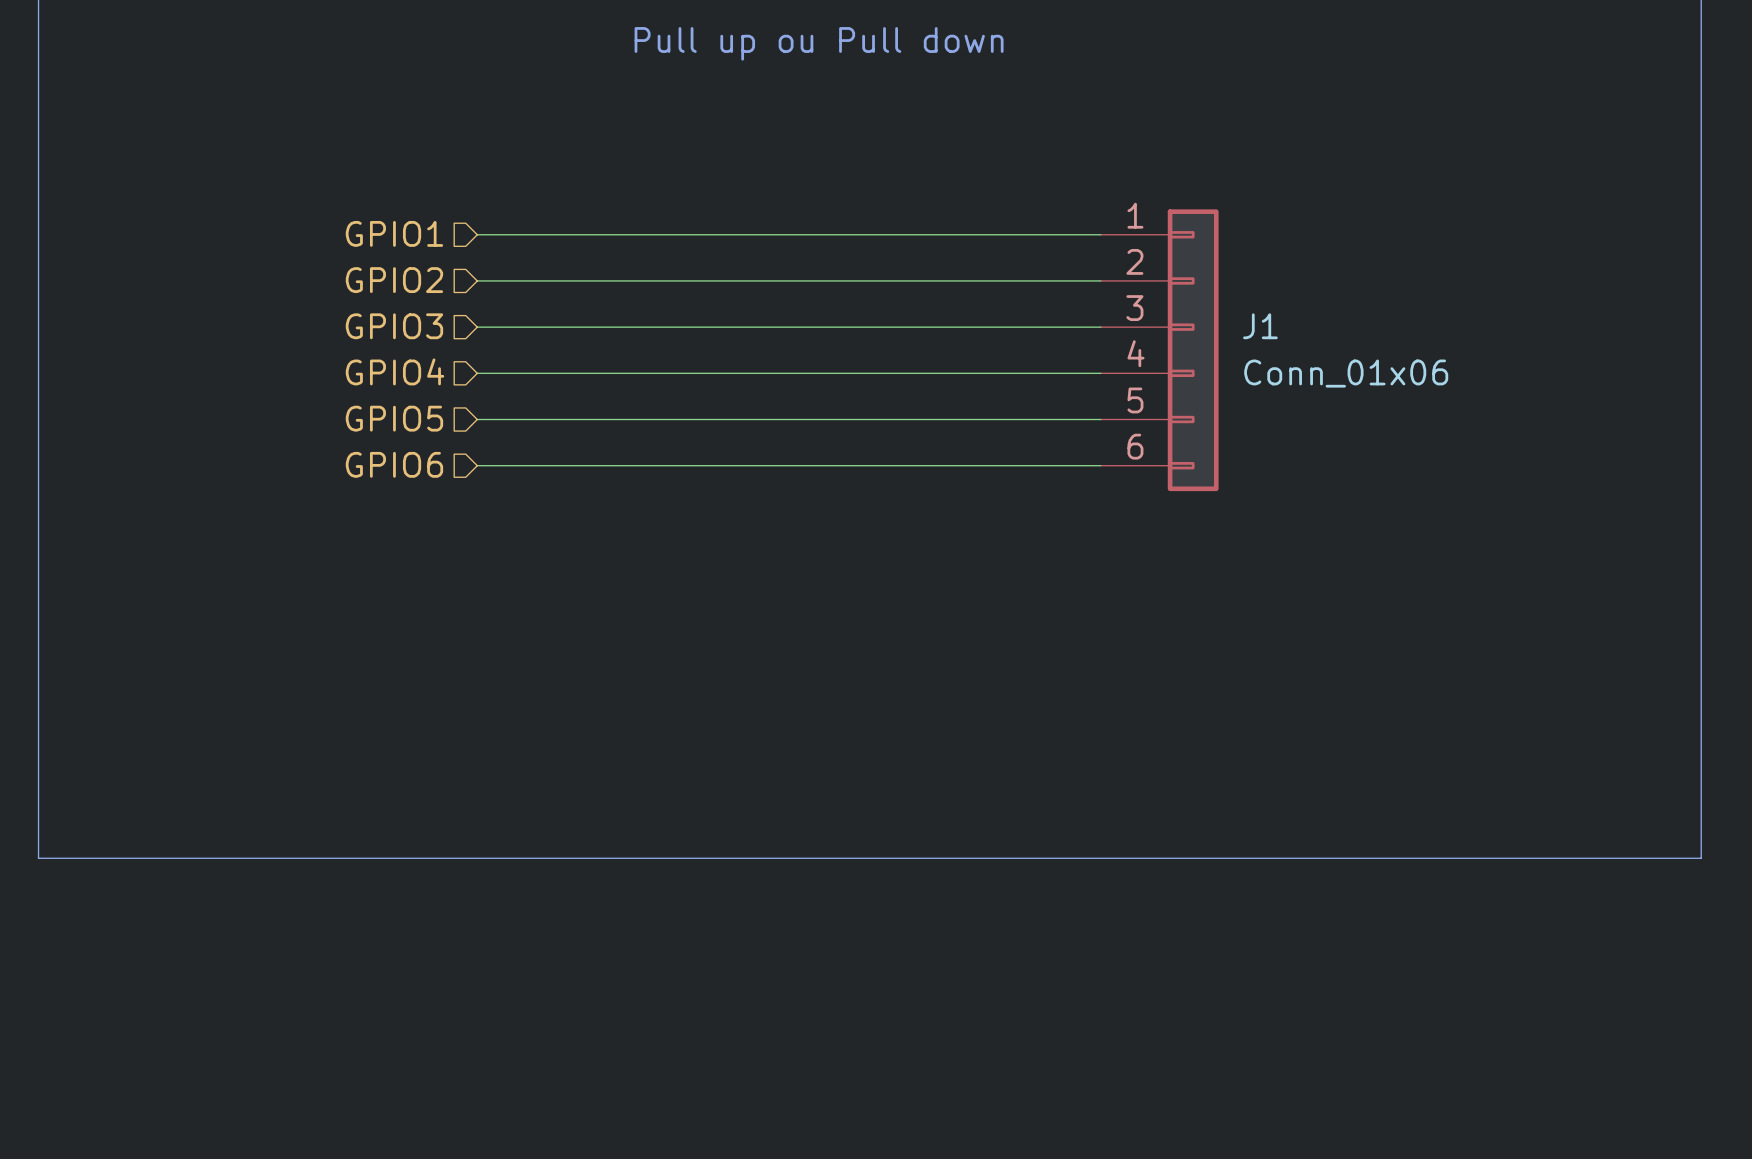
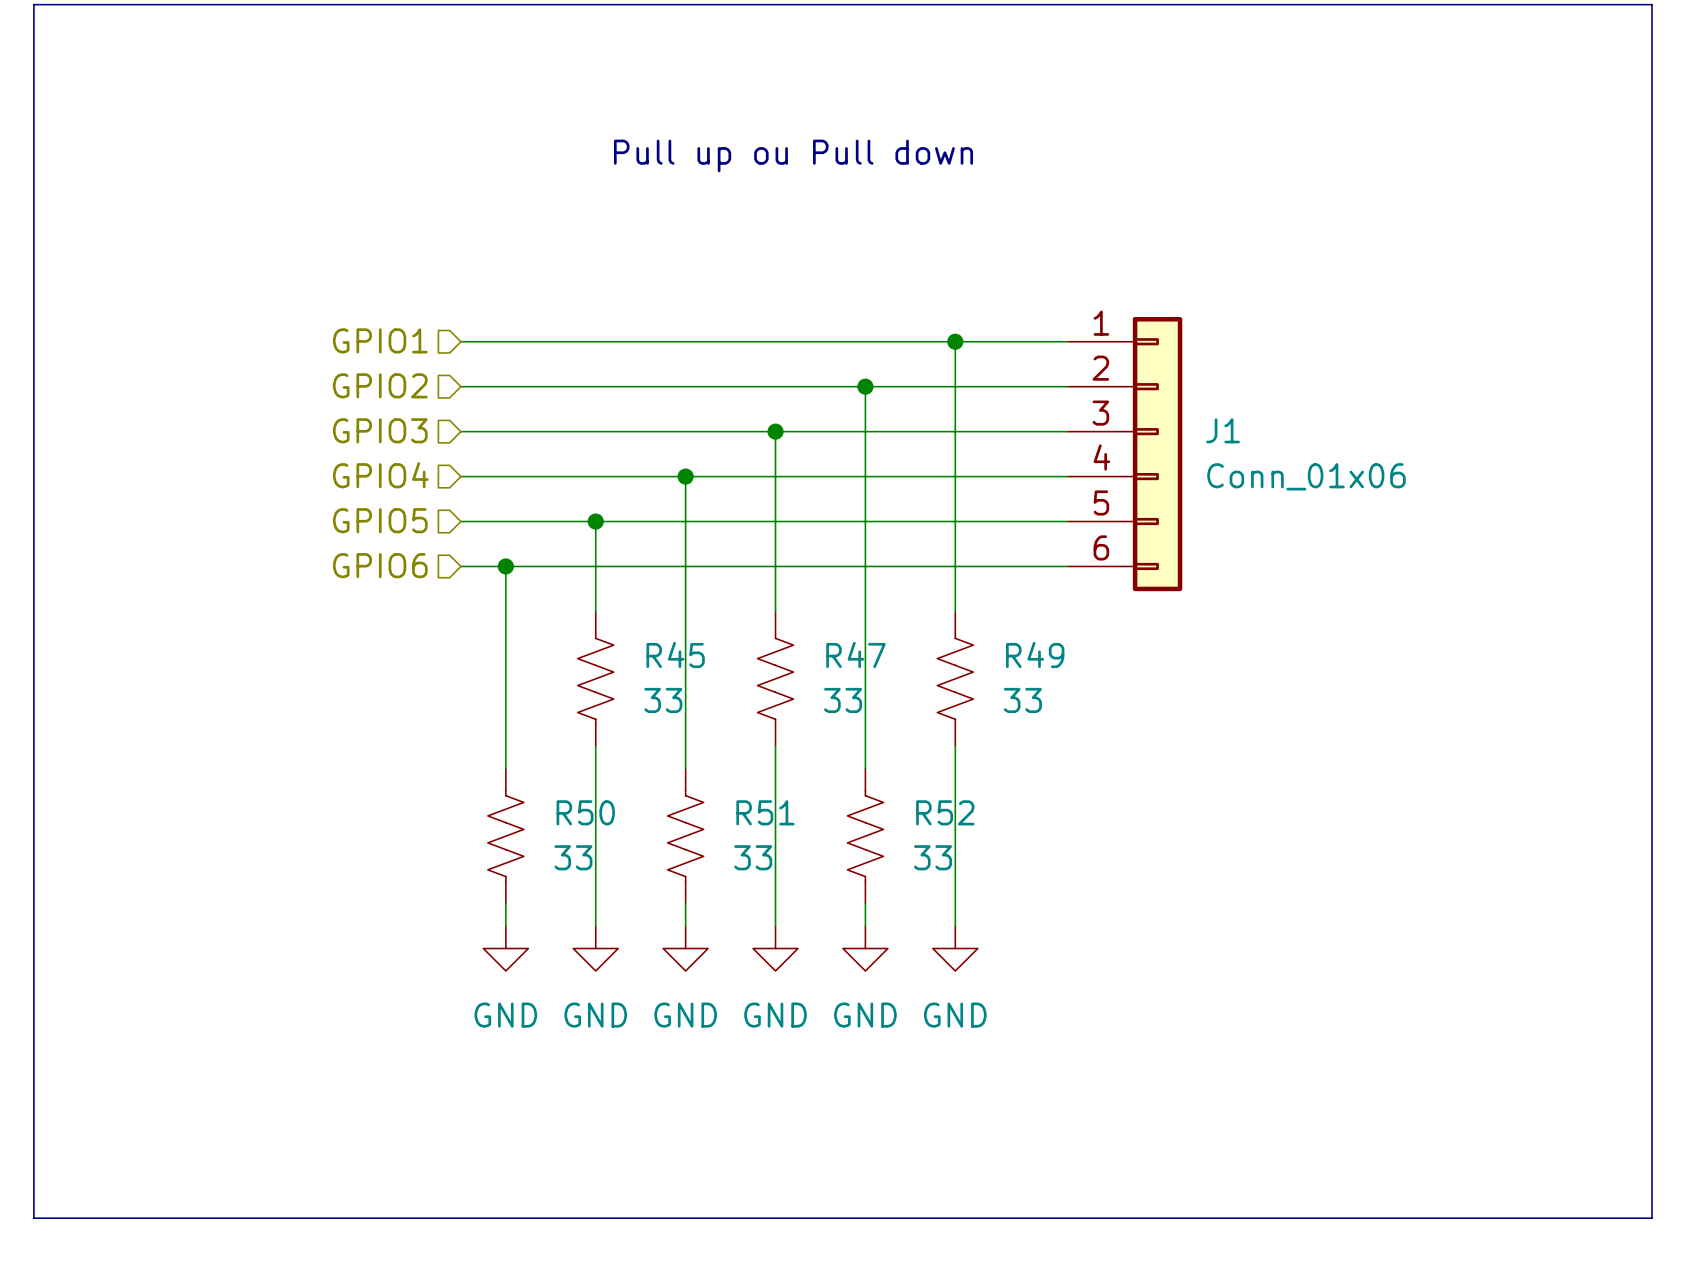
wire: none -> (955, 341) (955, 611)
junction: none -> (955, 341)
wire: none -> (865, 386) (865, 768)
junction: none -> (865, 386)
wire: none -> (775, 431) (775, 611)
junction: none -> (775, 431)
wire: none -> (685, 476) (685, 768)
junction: none -> (685, 476)
wire: none -> (595, 521) (595, 611)
junction: none -> (595, 521)
wire: none -> (505, 566) (505, 768)
junction: none -> (505, 566)
R45: none -> 33 (595, 678)
R47: none -> 33 (775, 678)
R49: none -> 33 (955, 678)
wire: none -> (595, 746) (595, 926)
wire: none -> (775, 746) (775, 926)
wire: none -> (955, 746) (955, 926)
R50: none -> 33 (505, 836)
R51: none -> 33 (685, 836)
R52: none -> 33 (865, 836)
wire: none -> (505, 903) (505, 926)
wire: none -> (685, 903) (685, 926)
wire: none -> (865, 903) (865, 926)
line: (38, 858) (1701, 858) -> (33, 948) (33, 1218) (1651, 1218) (1651, 948)
power symbol: none -> GND (505, 948)
power symbol: none -> GND (595, 948)
power symbol: none -> GND (685, 948)
power symbol: none -> GND (775, 948)
power symbol: none -> GND (865, 948)
power symbol: none -> GND (955, 948)

